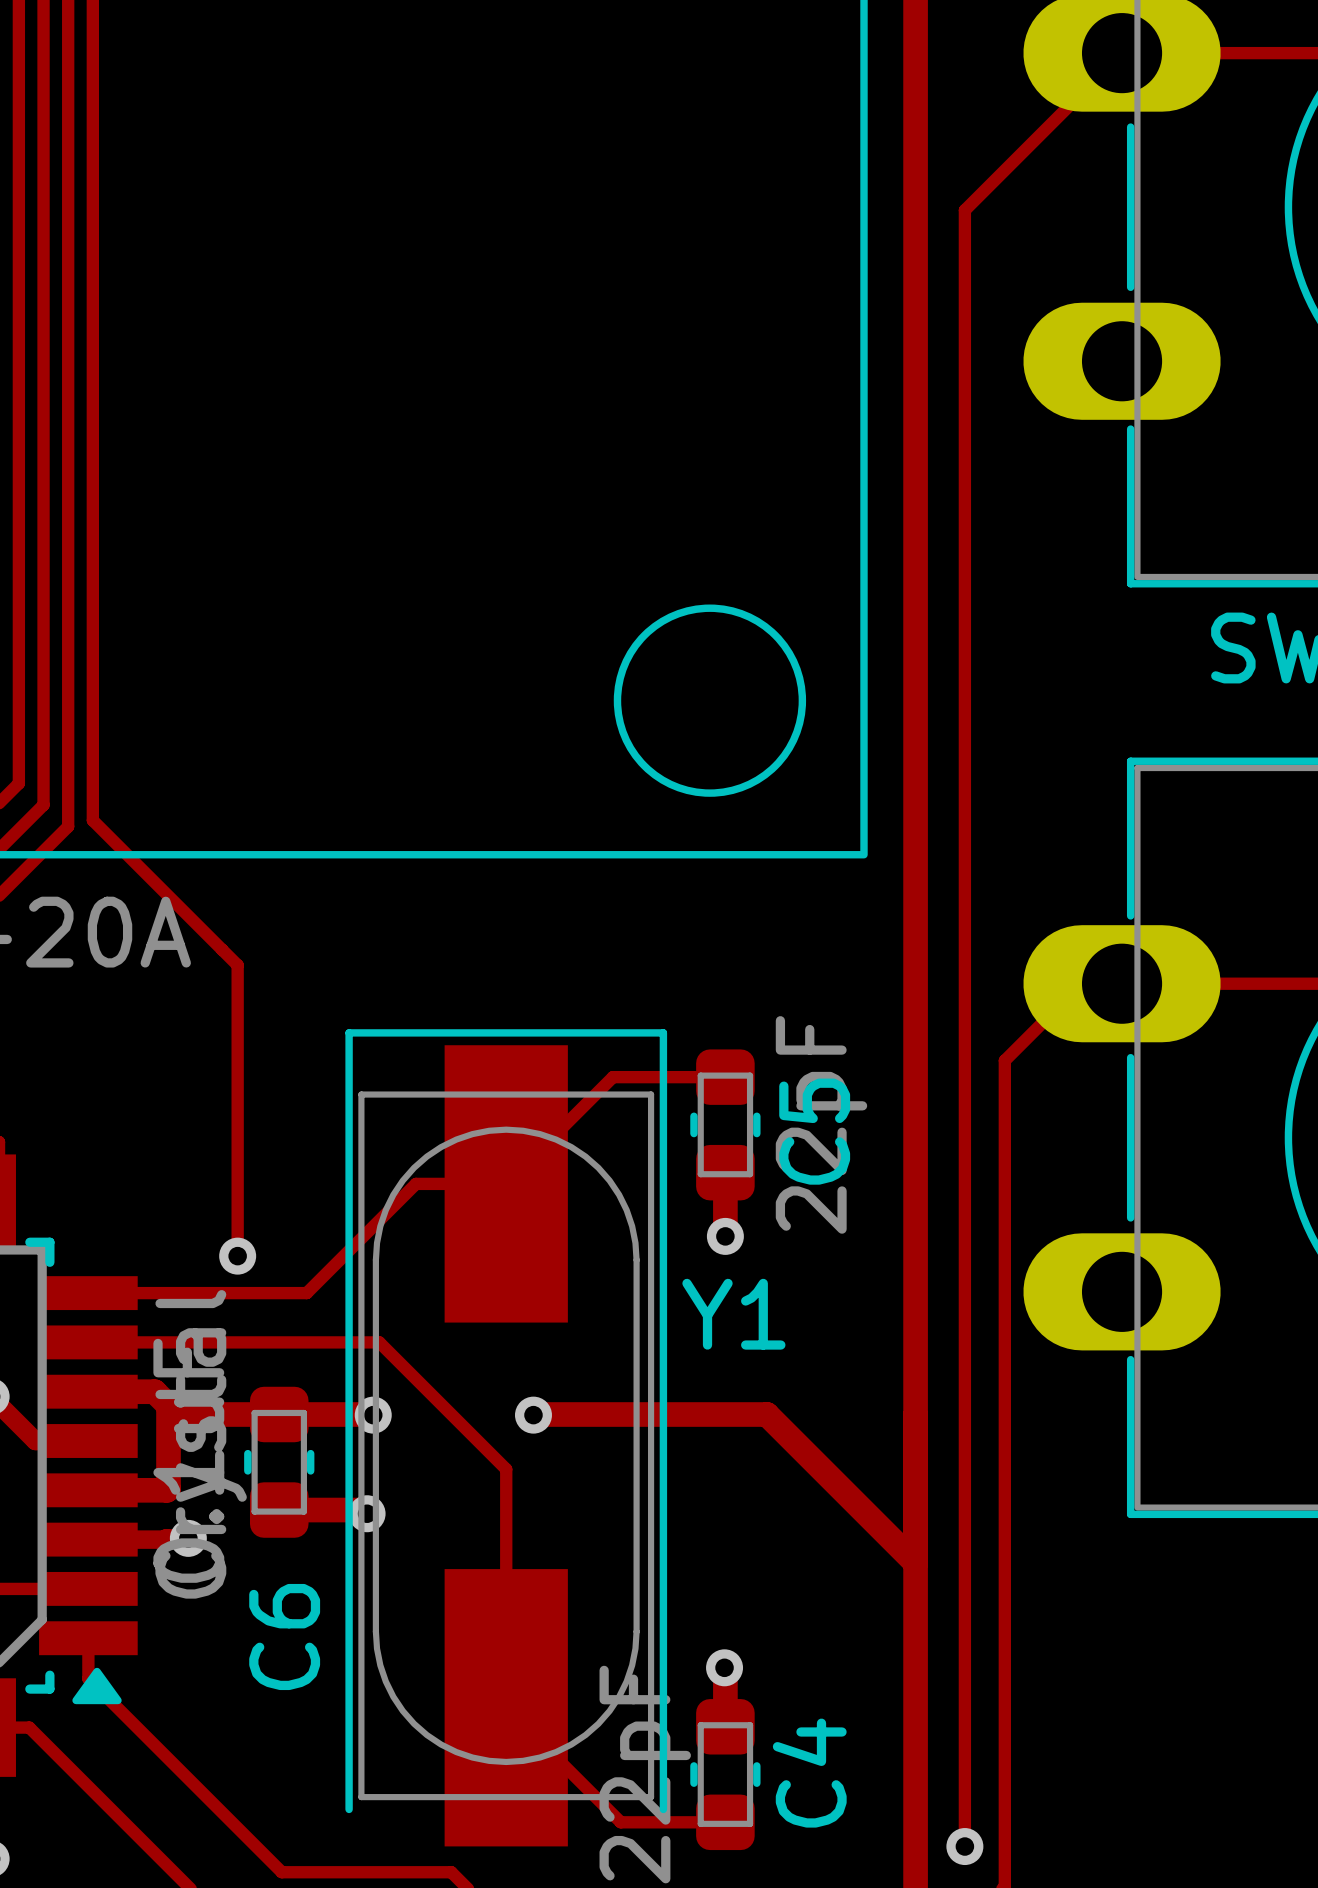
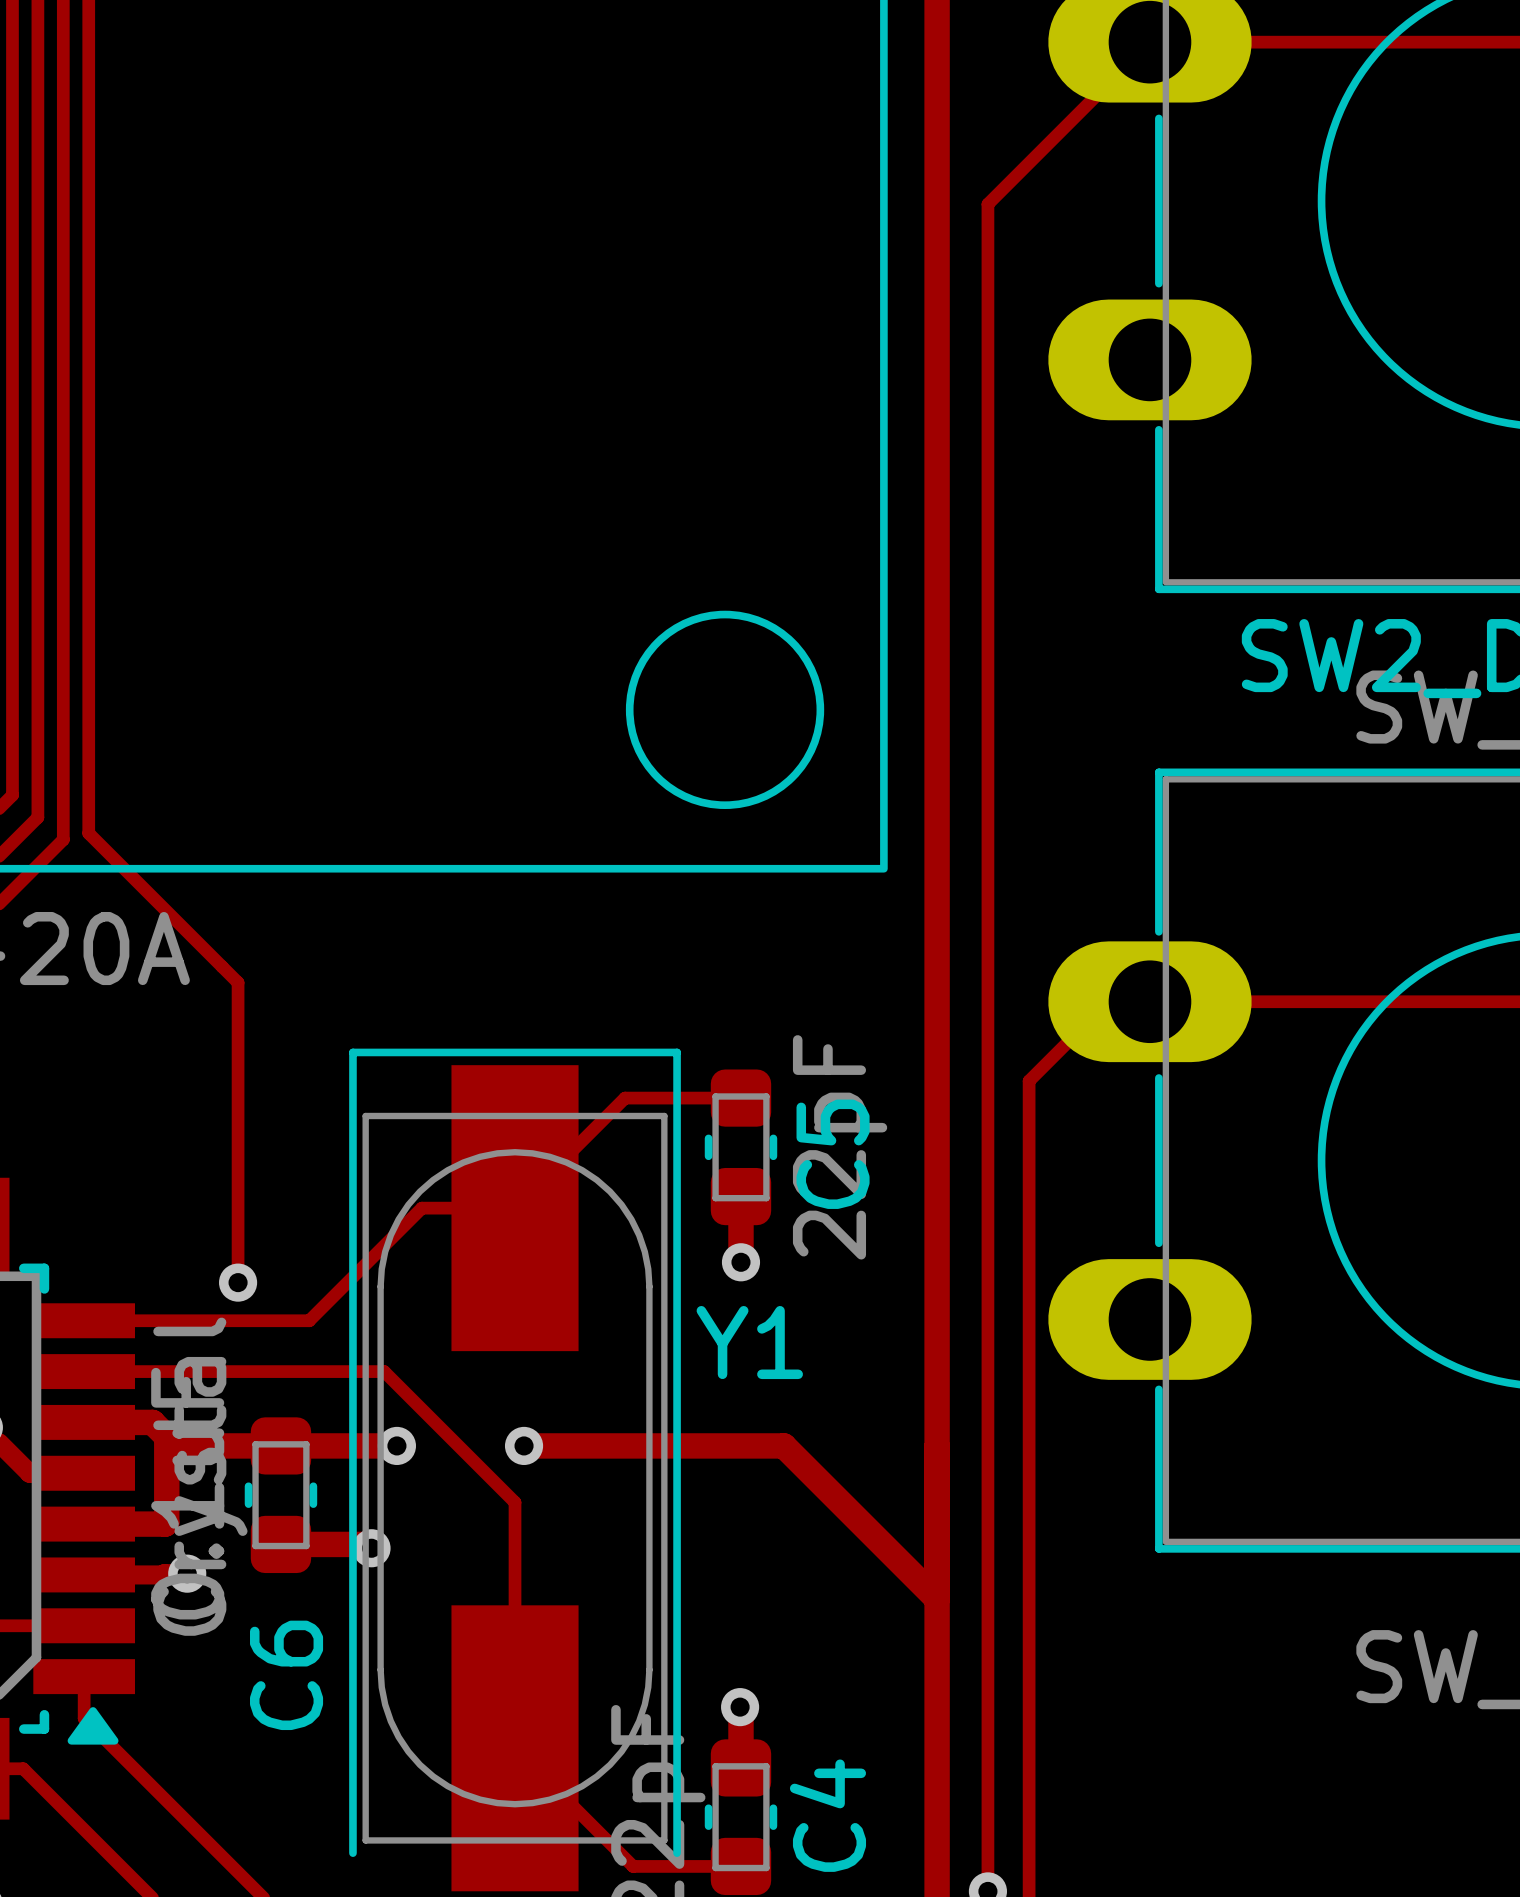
via position: (373, 1415) -> (396, 1445)
via position: (533, 1415) -> (524, 1445)

